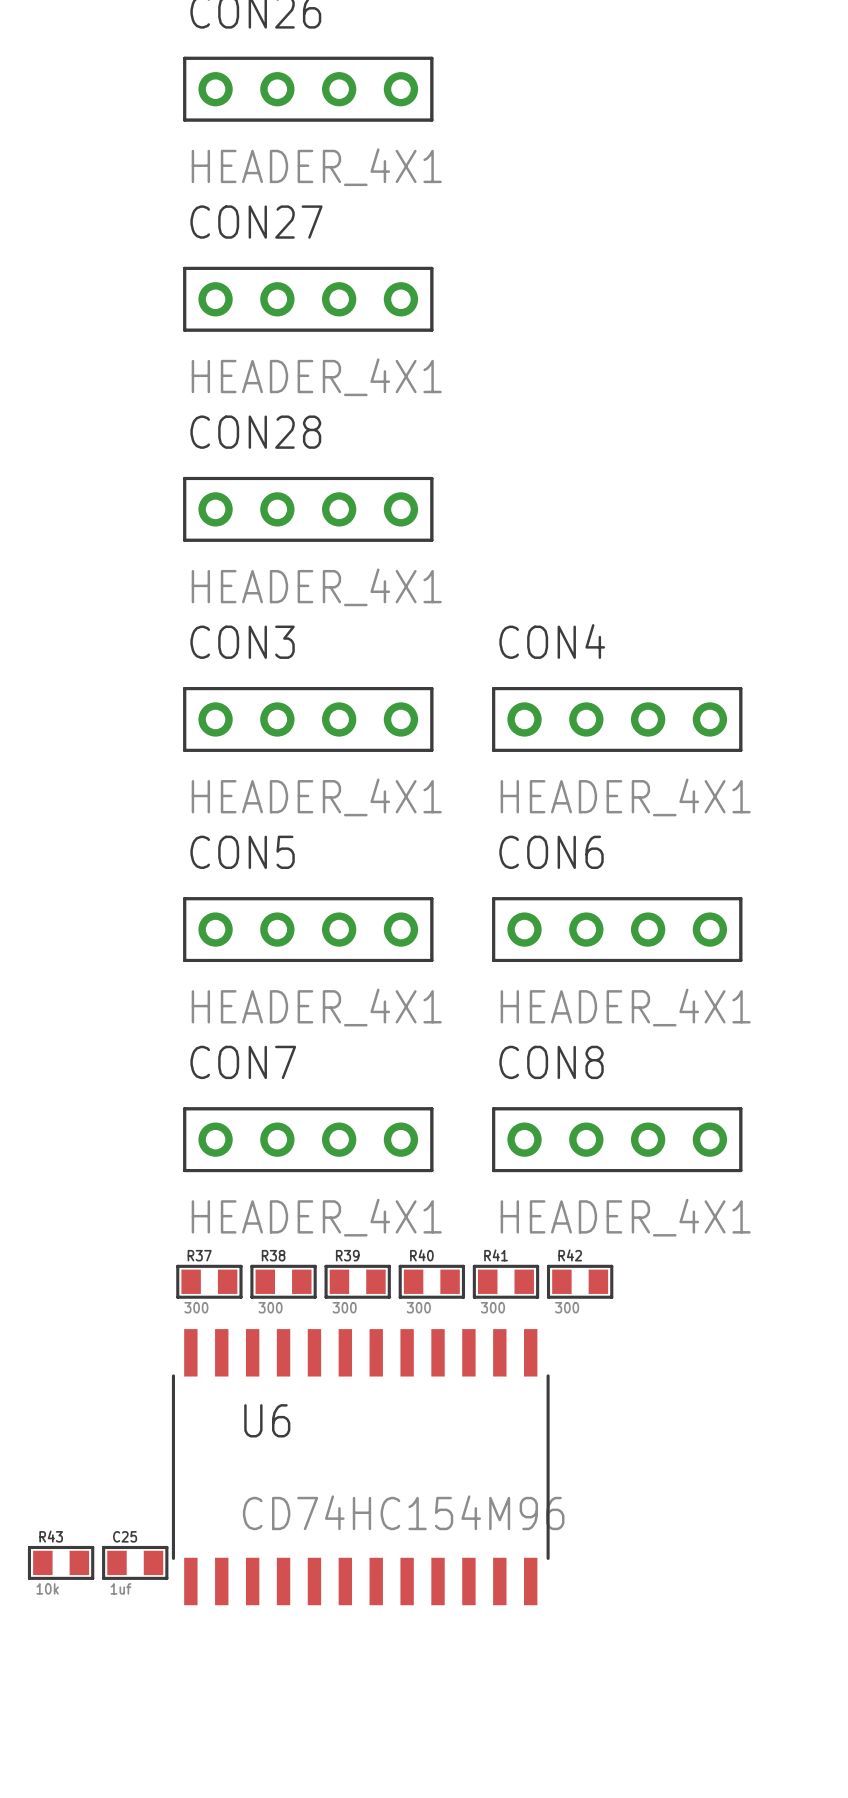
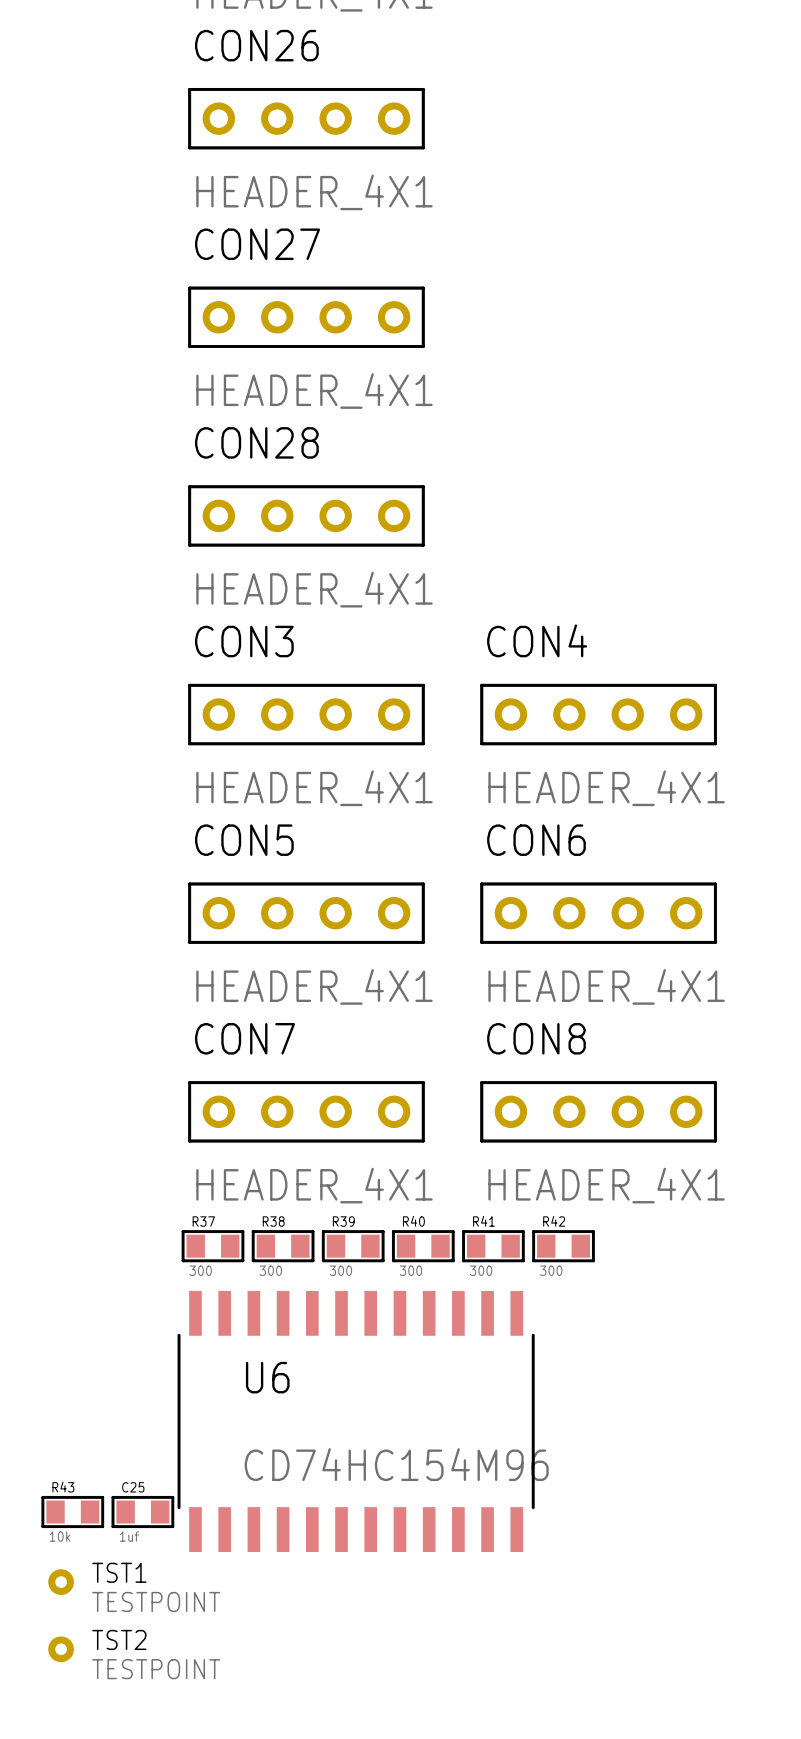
TST1: none -> TESTPOINT (61, 1582)
TST2: none -> TESTPOINT (61, 1649)

